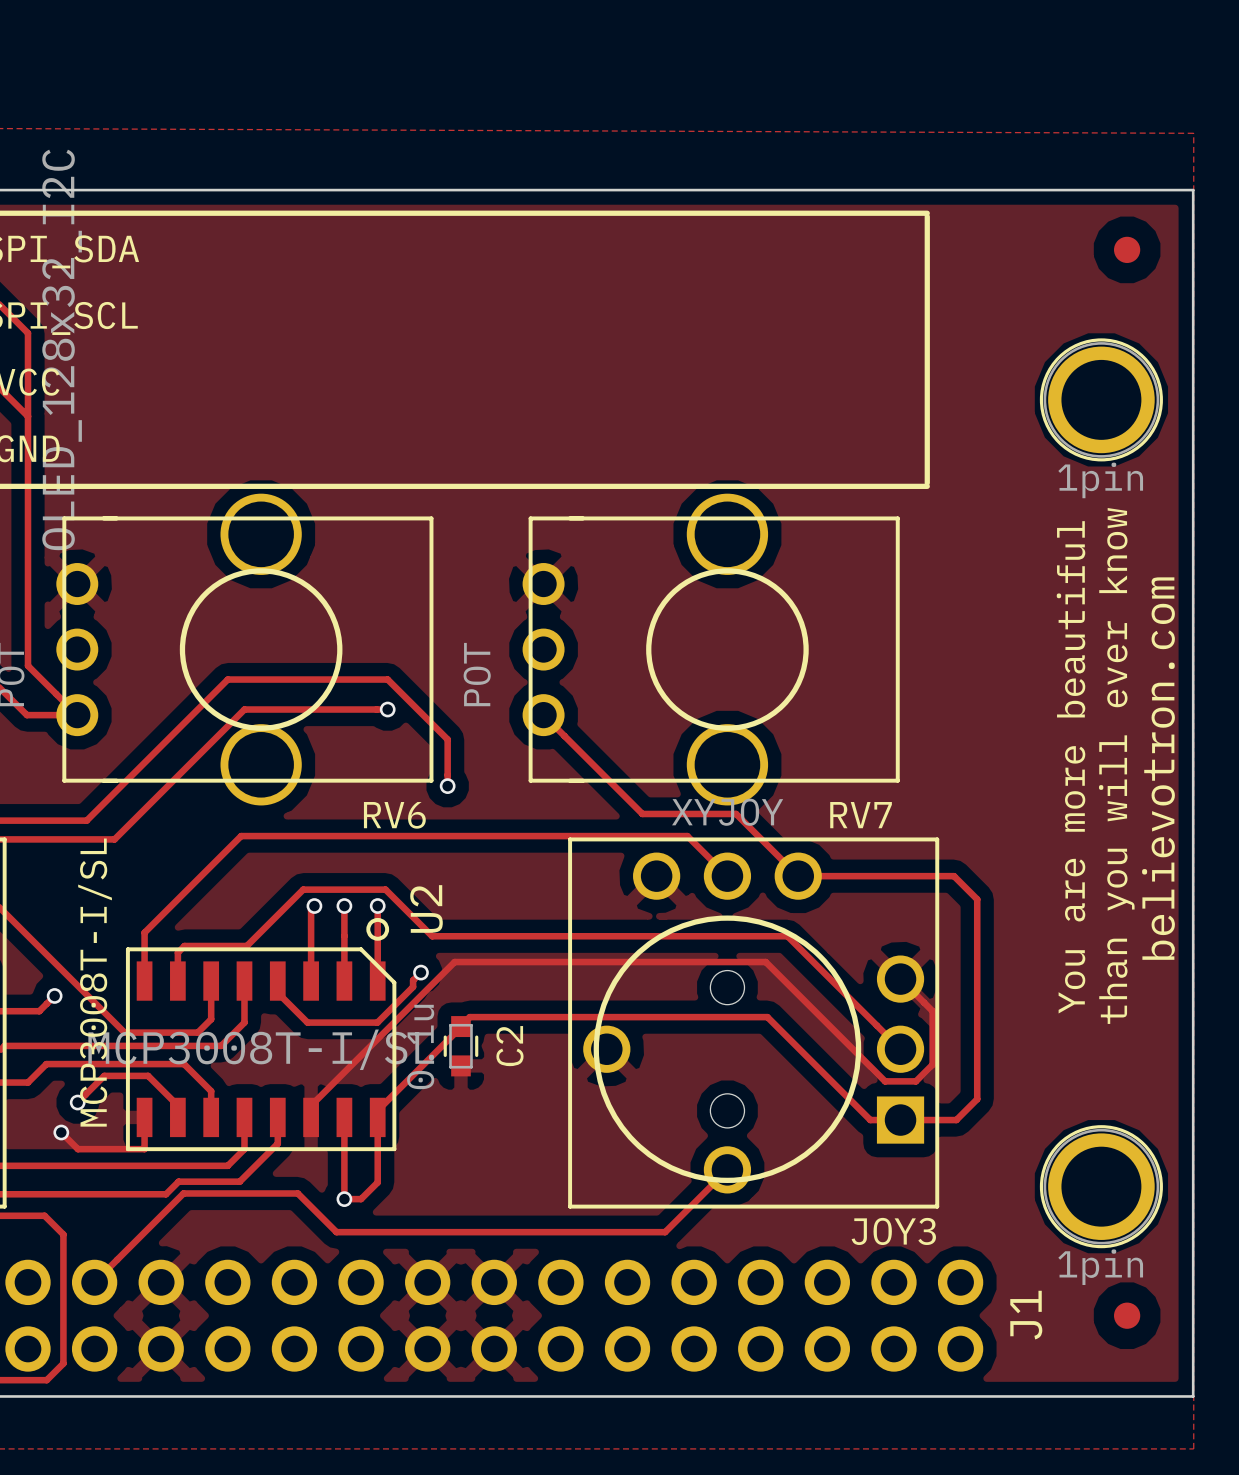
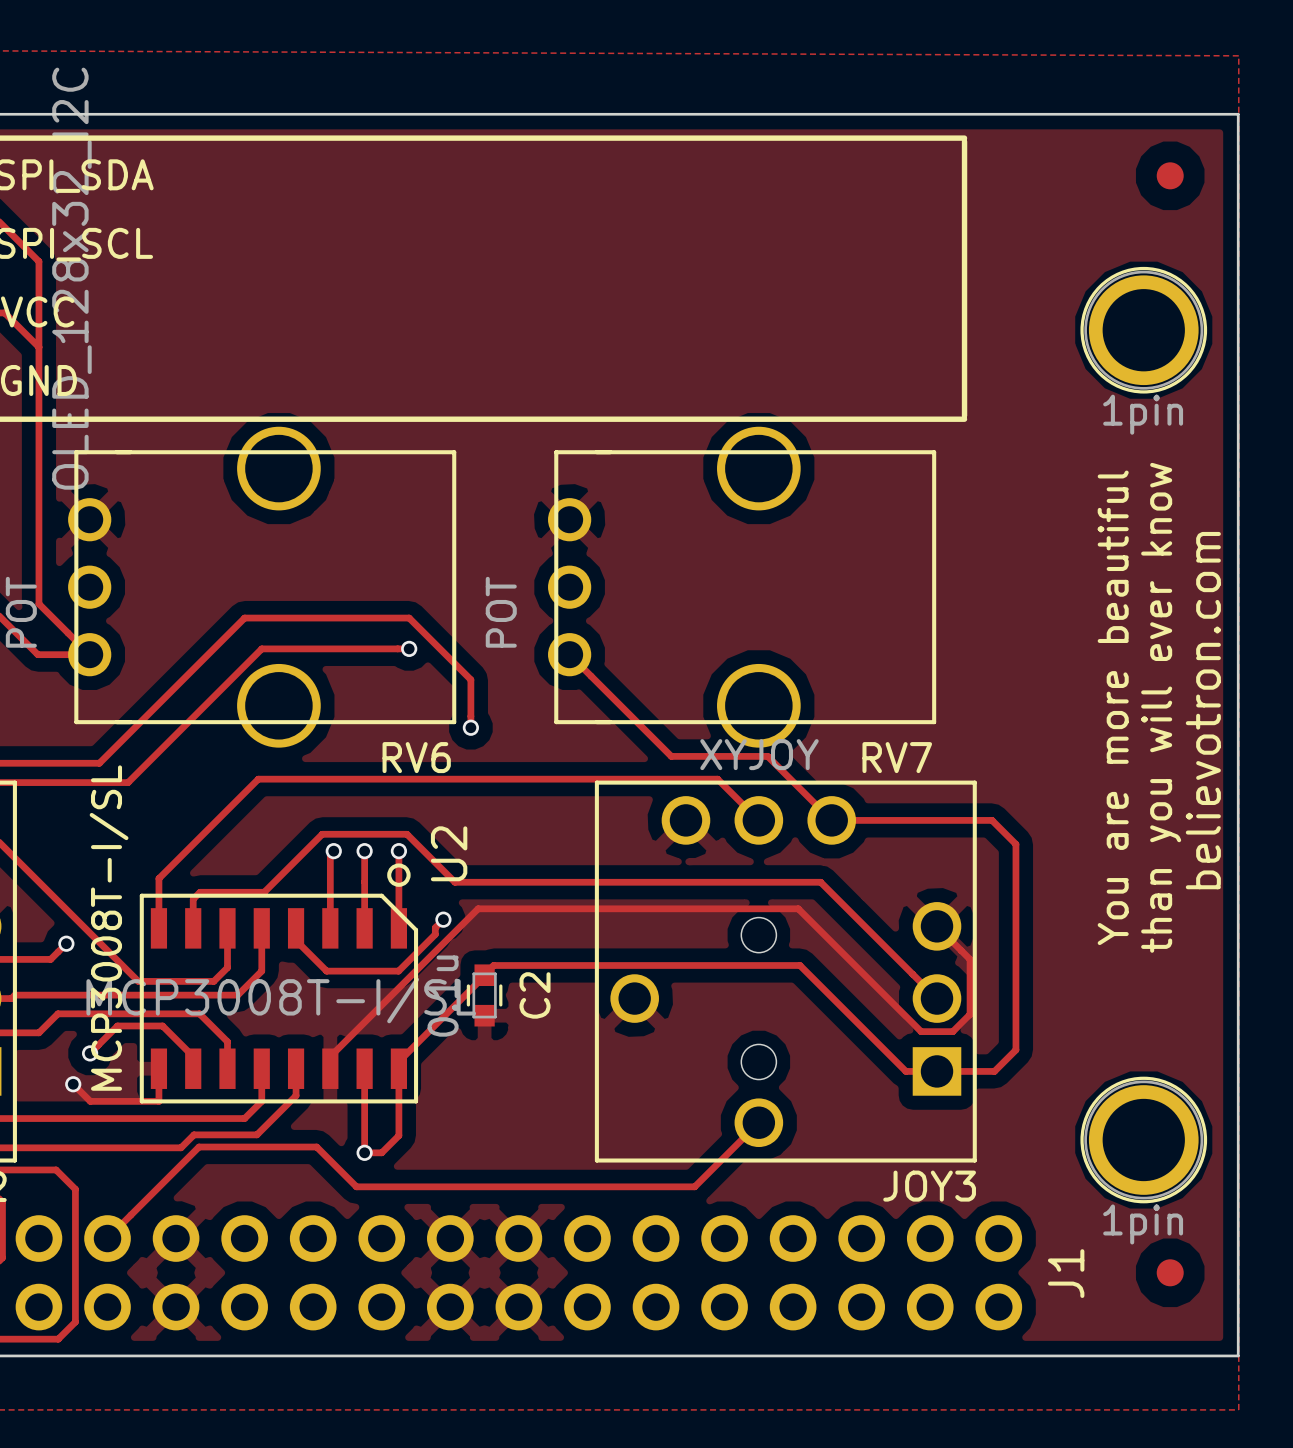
drawing: [179, 568, 343, 731] -> none
drawing: [646, 568, 809, 731] -> none
drawing: [593, 915, 862, 1184] -> none

